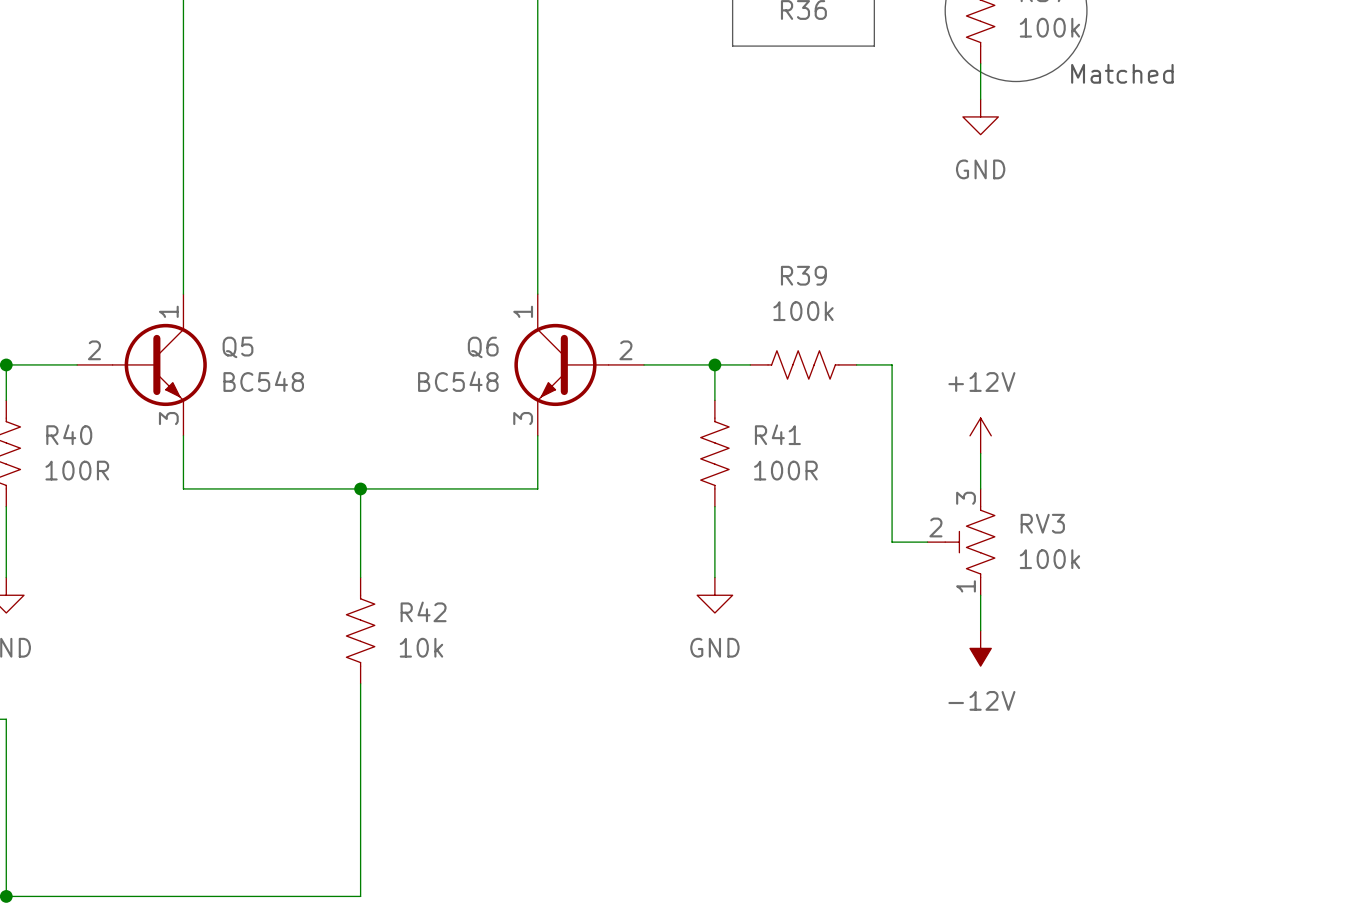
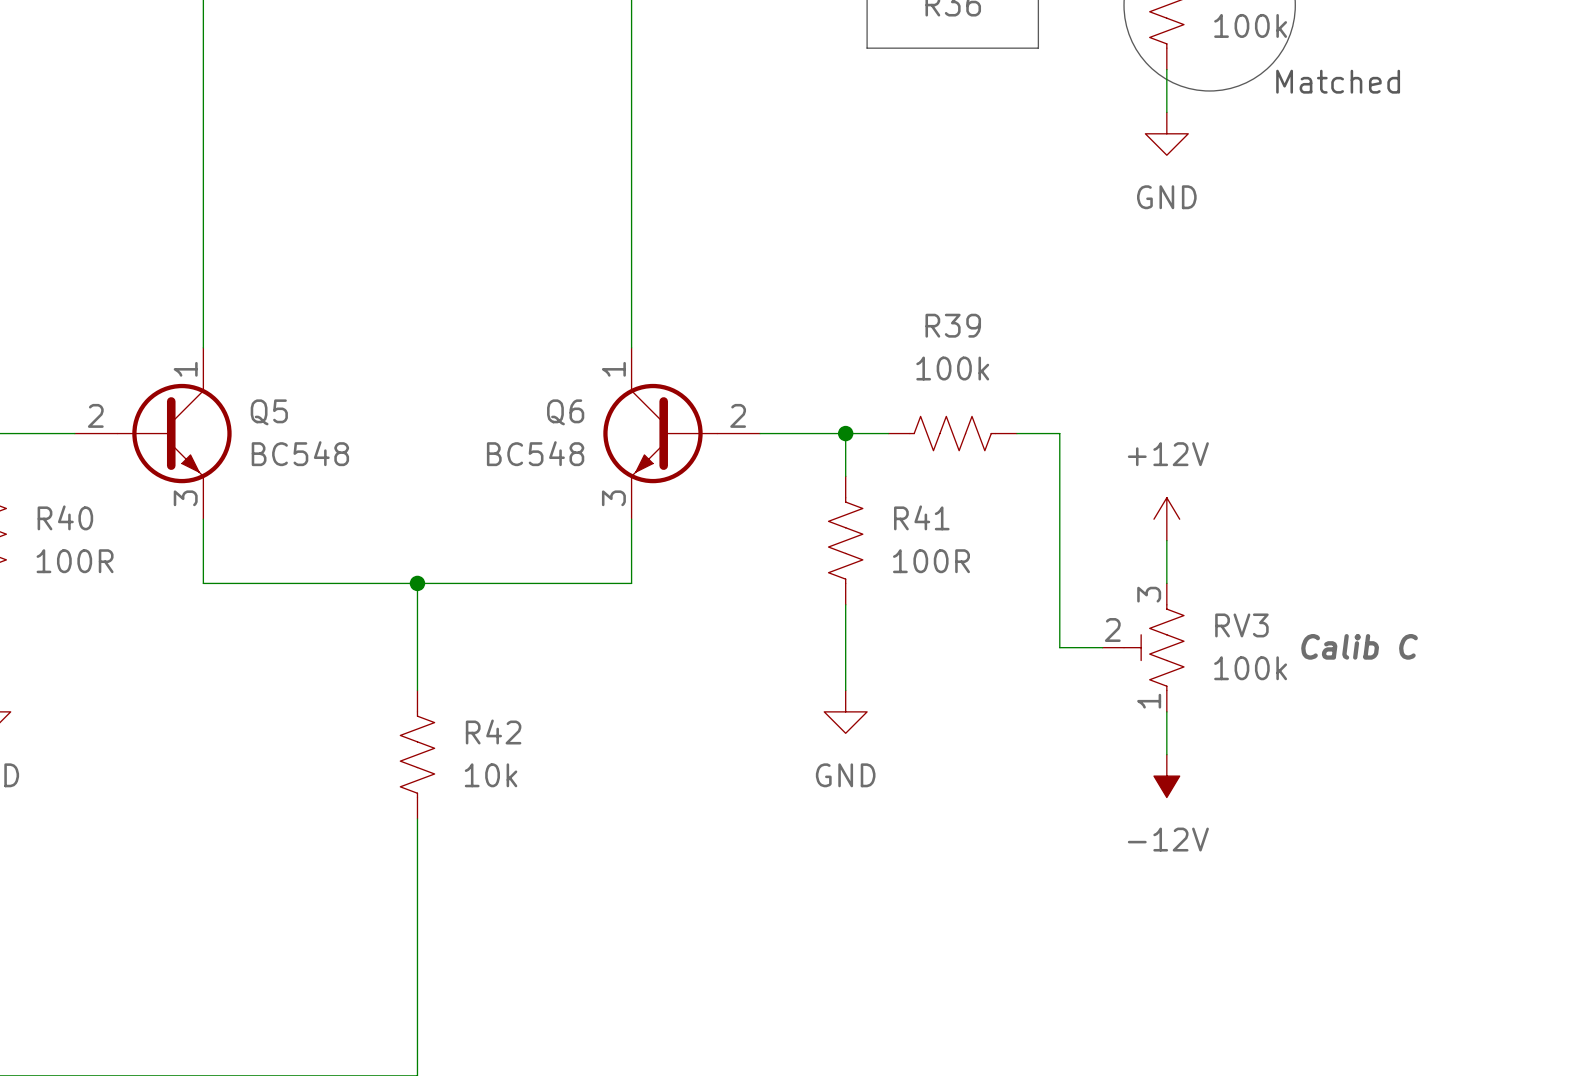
RV3 text: none -> Calib C (1359, 646)

